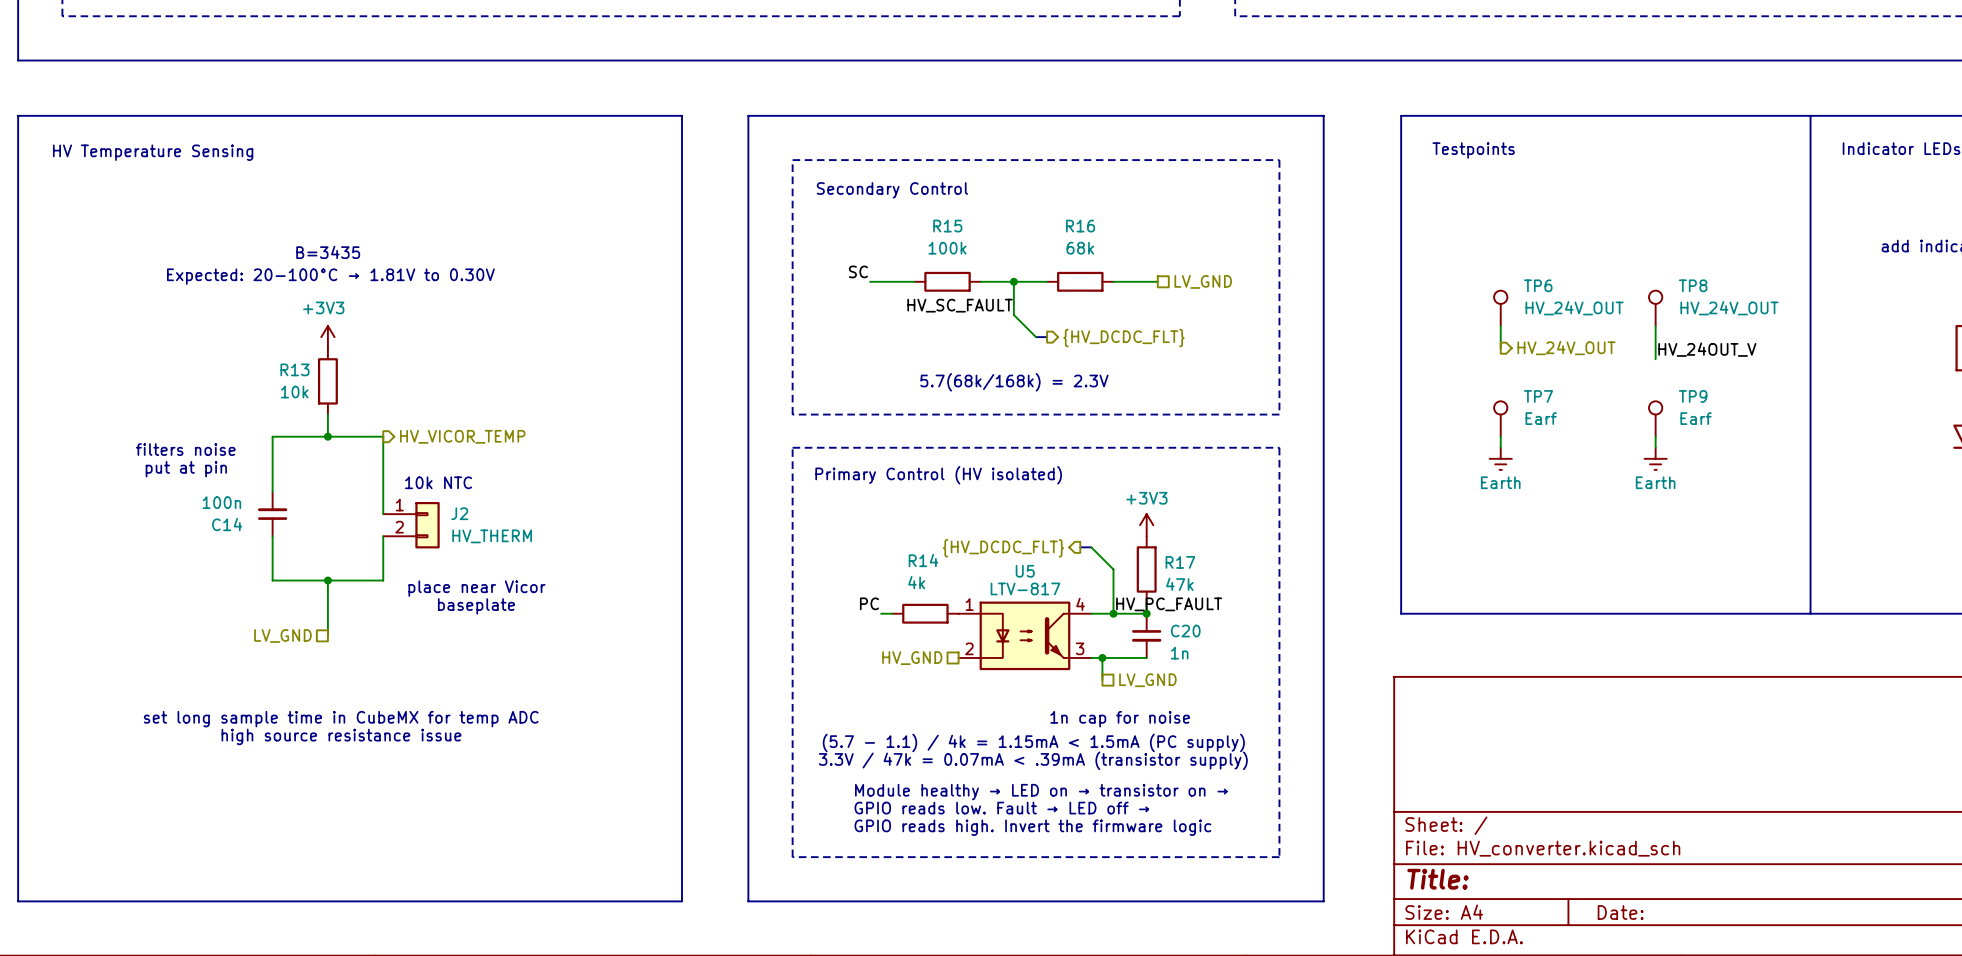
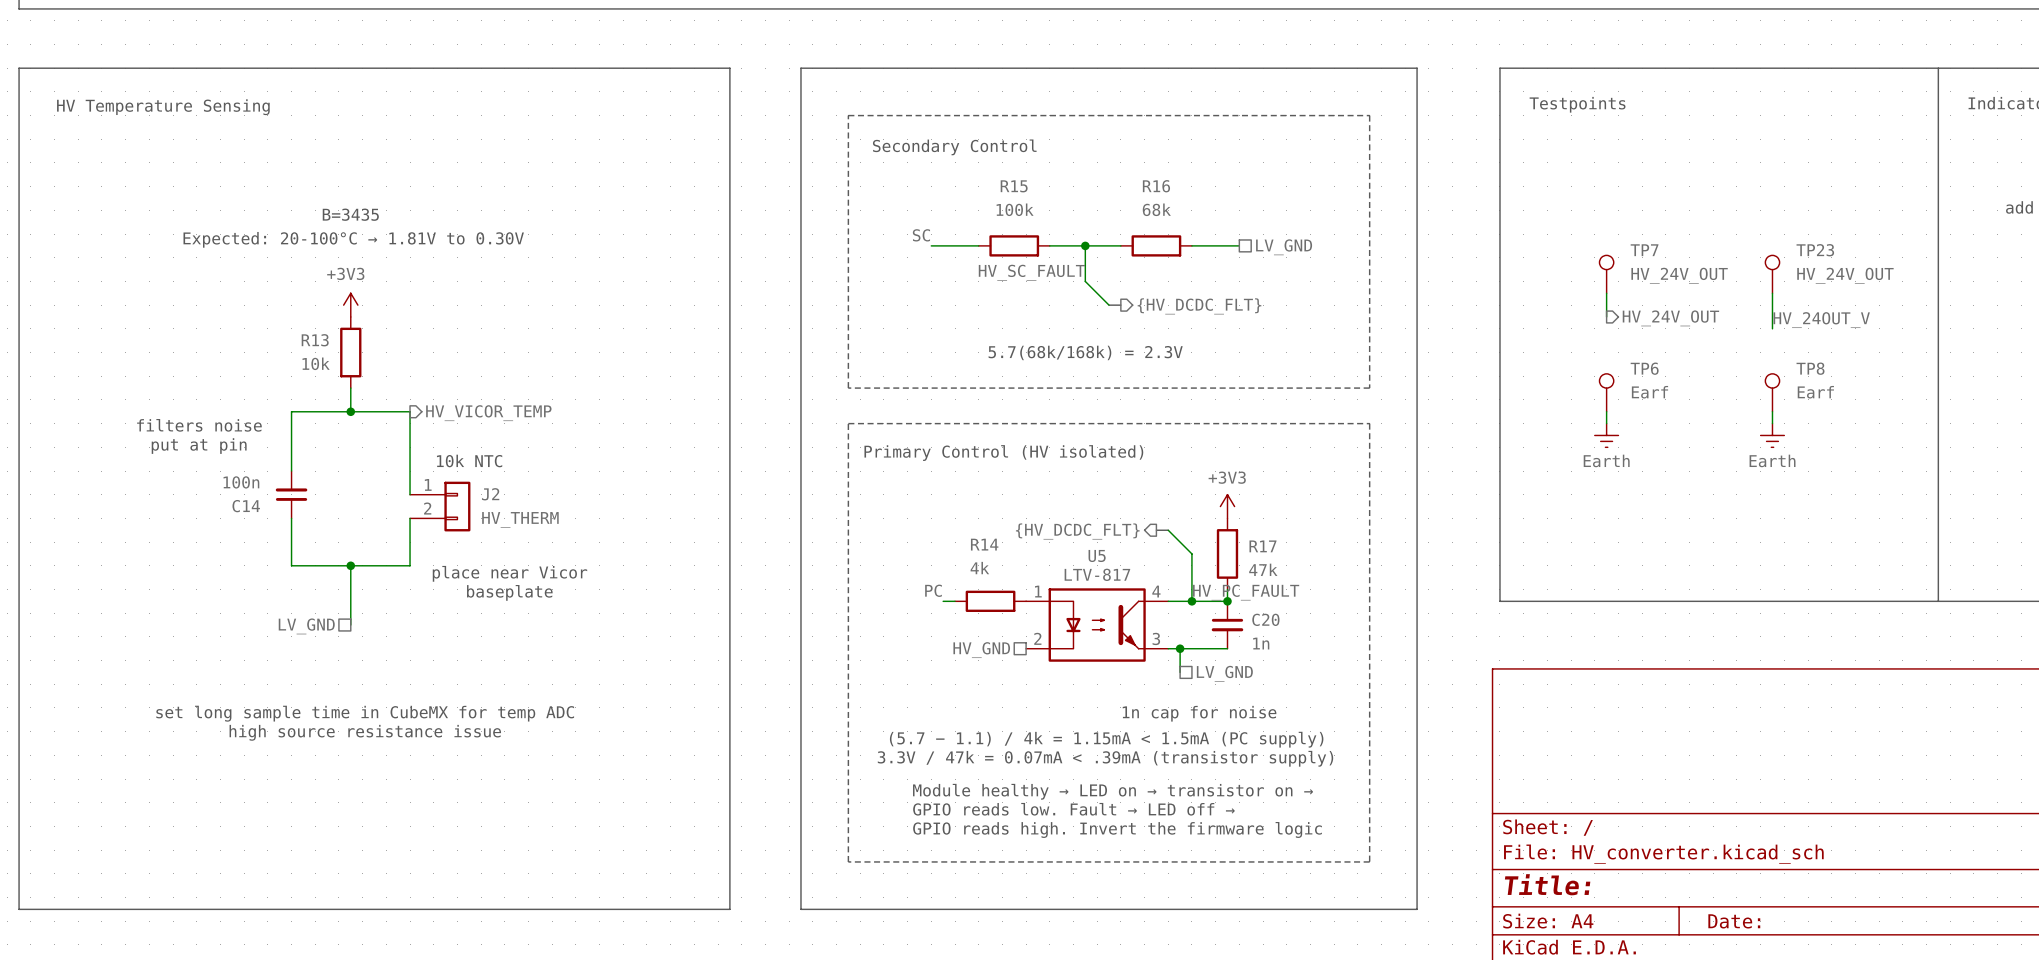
TP6 name: TP6 (1538, 285) -> TP7 (1644, 250)
TP8 name: TP8 (1693, 285) -> TP23 (1815, 250)
TP7 name: TP7 (1538, 396) -> TP6 (1644, 368)
TP9 name: TP9 (1693, 396) -> TP8 (1810, 368)

